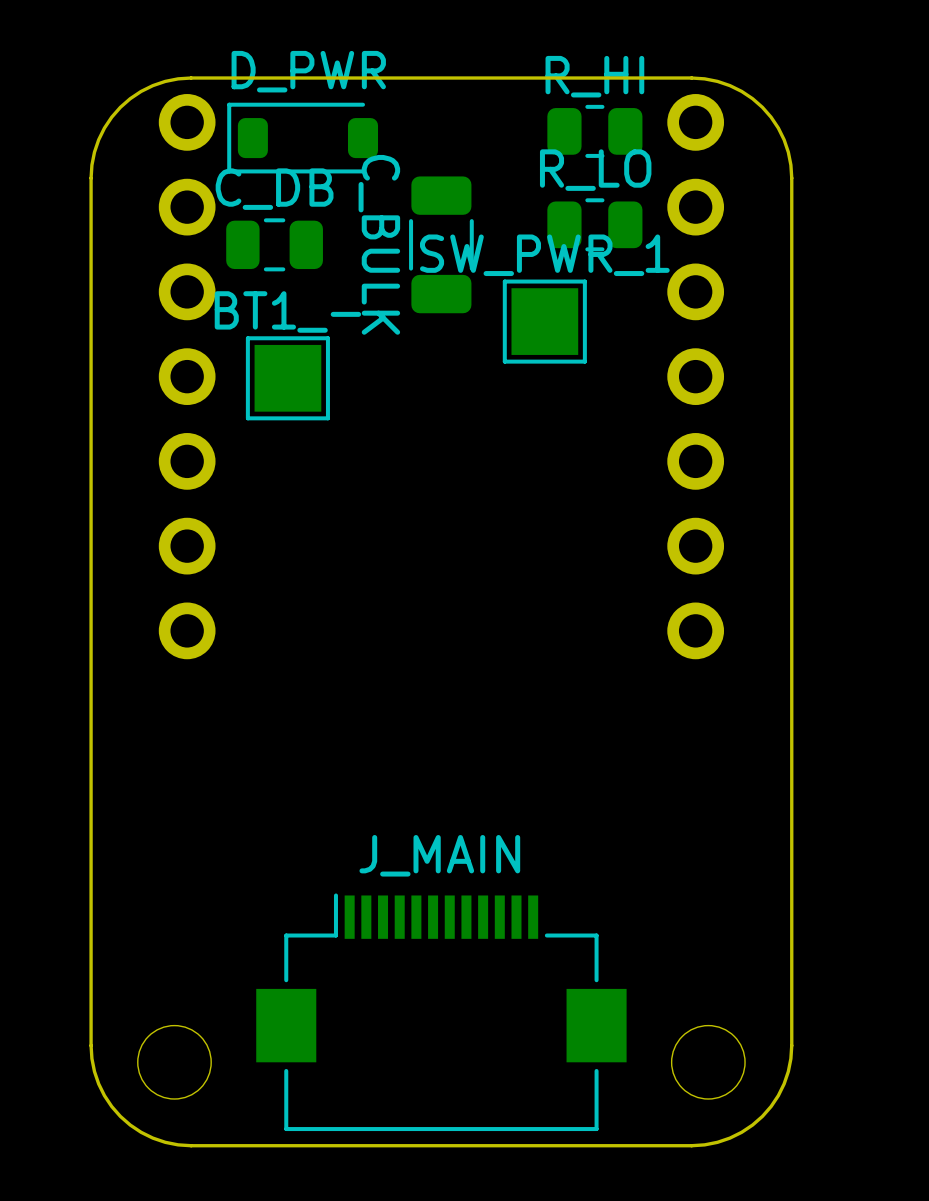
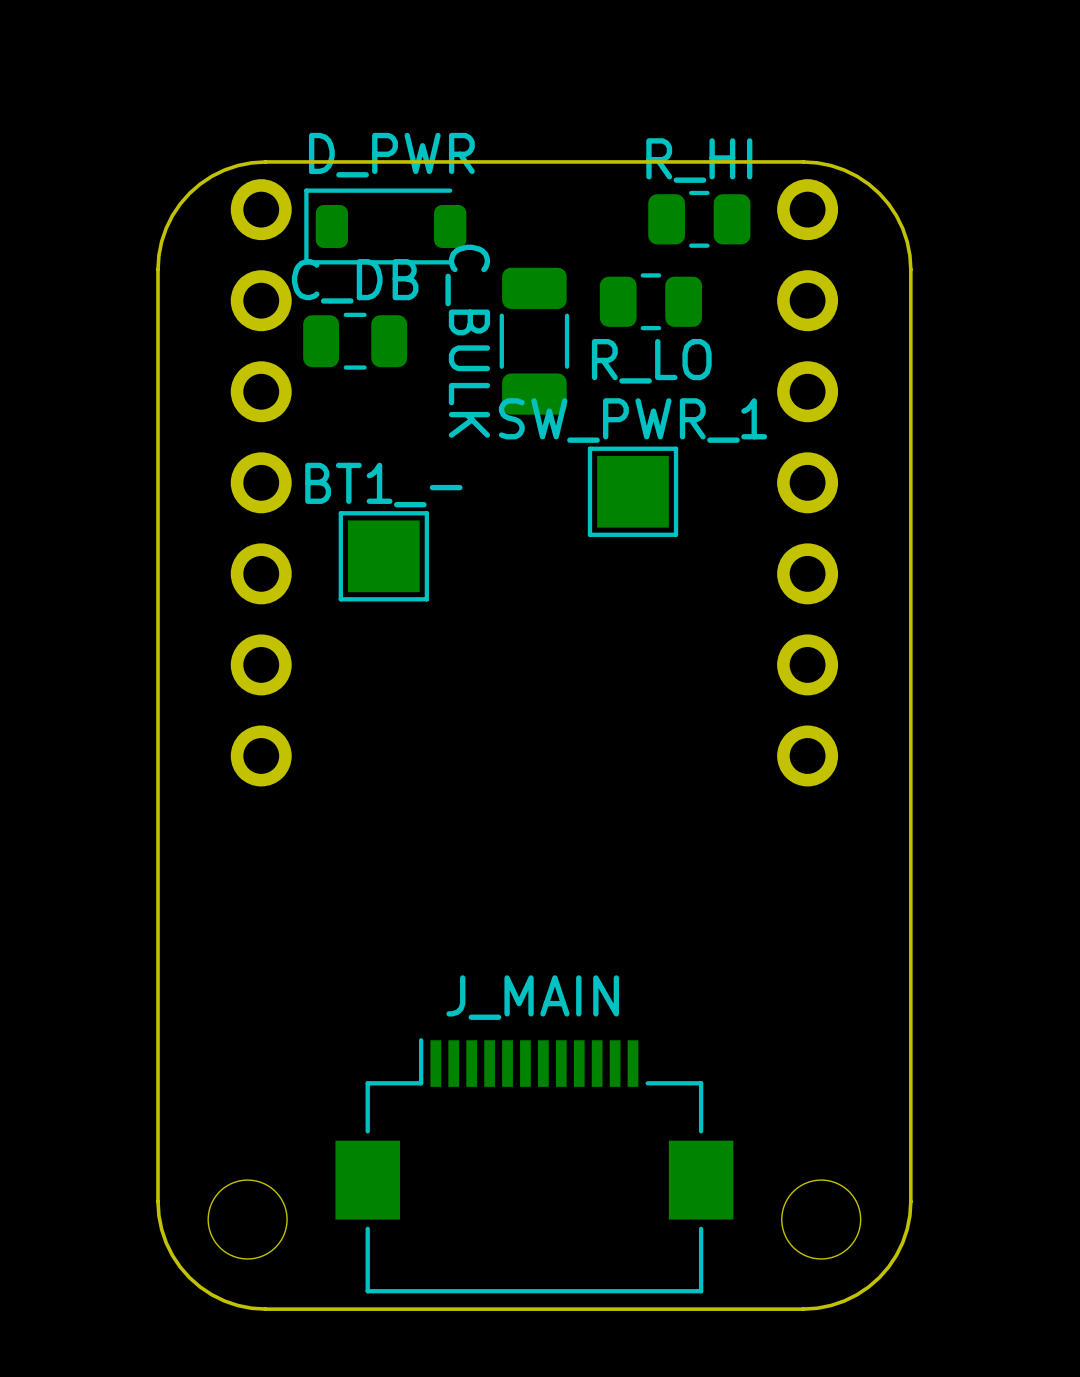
R_LO name position: R_LO (595, 170) -> R_LO (651, 361)
R_LO position: (594, 224) -> (650, 301)
SW_PWR_1 position: (544, 321) -> (633, 491)
BT1_- position: (287, 378) -> (383, 556)

